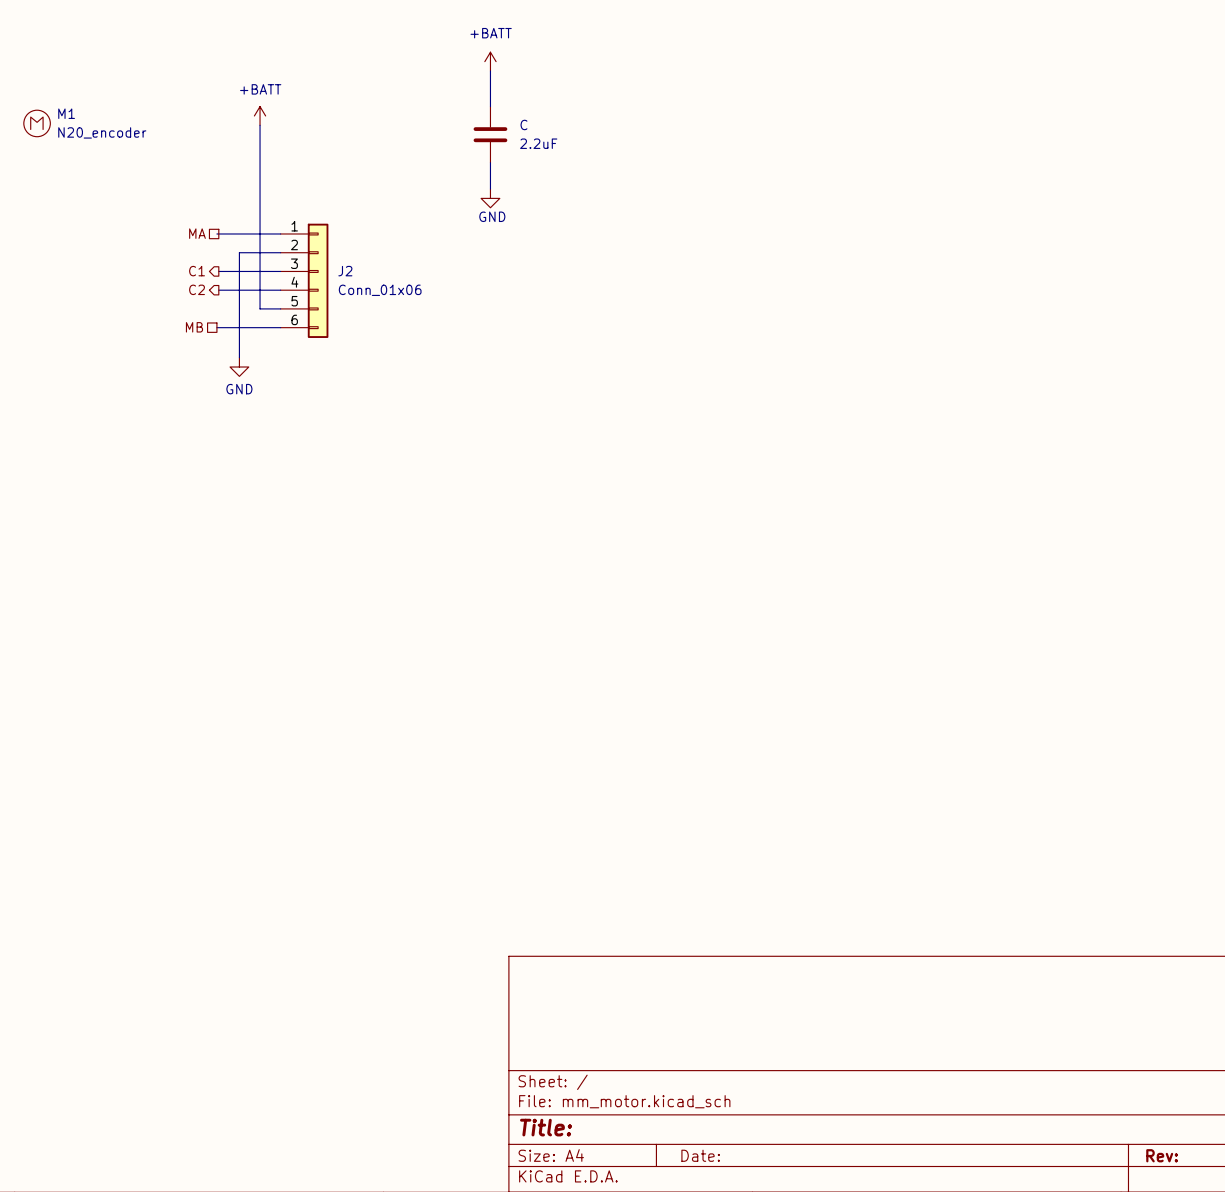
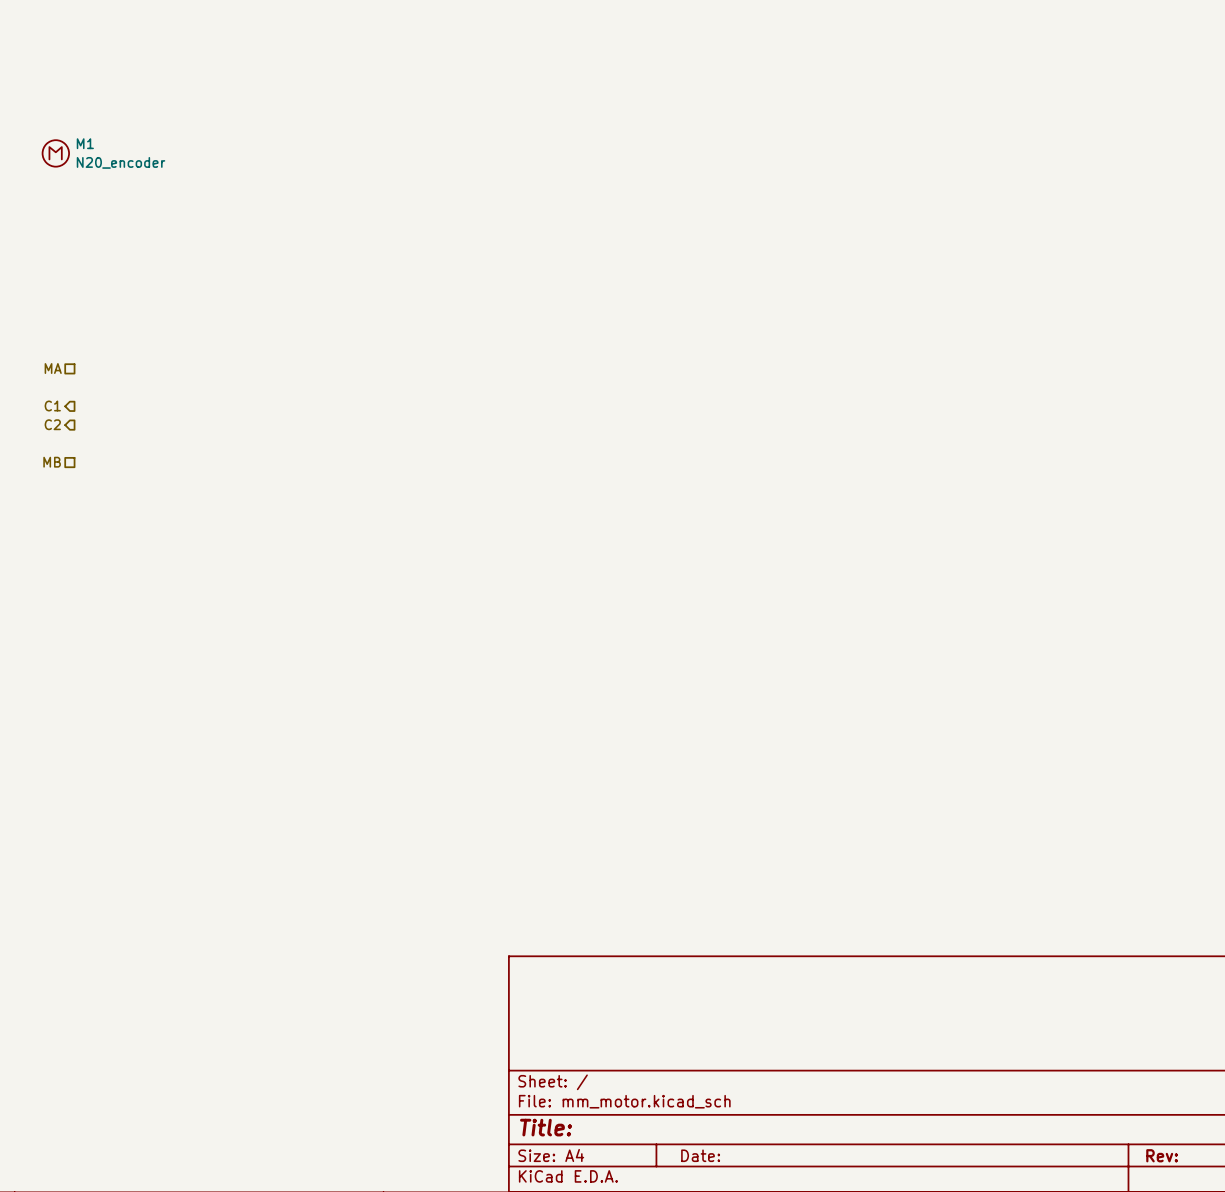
power symbol: +BATT (490, 61) -> none
wire: (490, 71) (490, 106) -> none
power symbol: +BATT (260, 115) -> none
M1 position: (37, 123) -> (55, 153)
wire: (260, 125) (260, 308) (280, 308) -> none
C: 2.2uF (490, 134) -> none
wire: (490, 162) (490, 189) -> none
power symbol: GND (490, 198) -> none
hierarchical label: MA (197, 233) -> none
wire: (216, 233) (280, 233) -> none
wire: (280, 252) (239, 252) (239, 357) -> none
hierarchical label: C1 (197, 271) -> none
wire: (218, 271) (280, 271) -> none
J2: Conn_01x06 (304, 280) -> none
hierarchical label: C2 (197, 289) -> none
wire: (218, 290) (280, 290) -> none
hierarchical label: MB (194, 327) -> none
wire: (216, 327) (280, 327) -> none
power symbol: GND (239, 367) -> none
hierarchical label: none -> MA (53, 368)
hierarchical label: none -> C1 (52, 406)
hierarchical label: none -> C2 (52, 424)
hierarchical label: none -> MB (52, 462)

